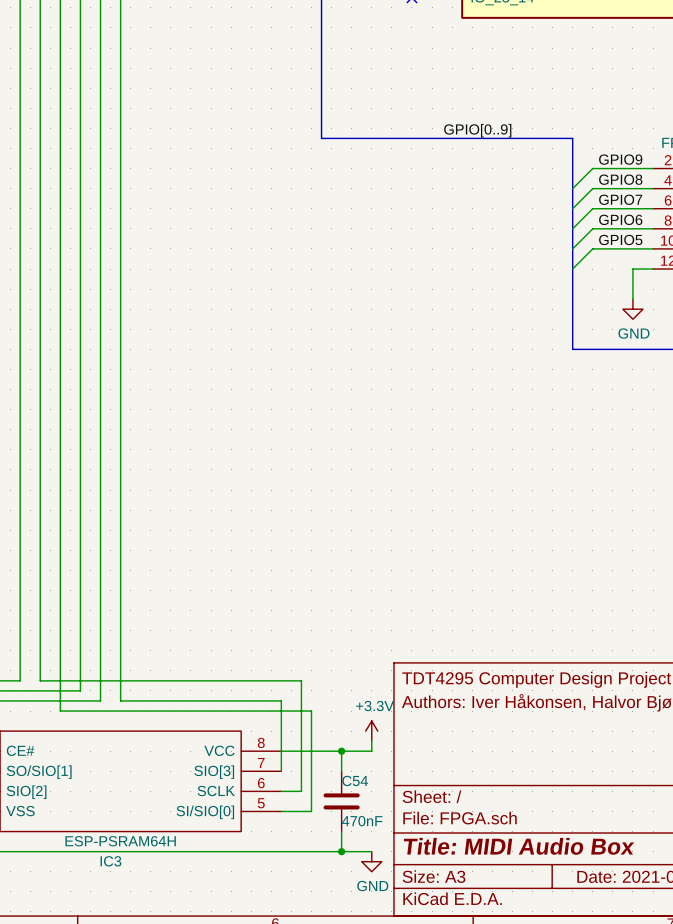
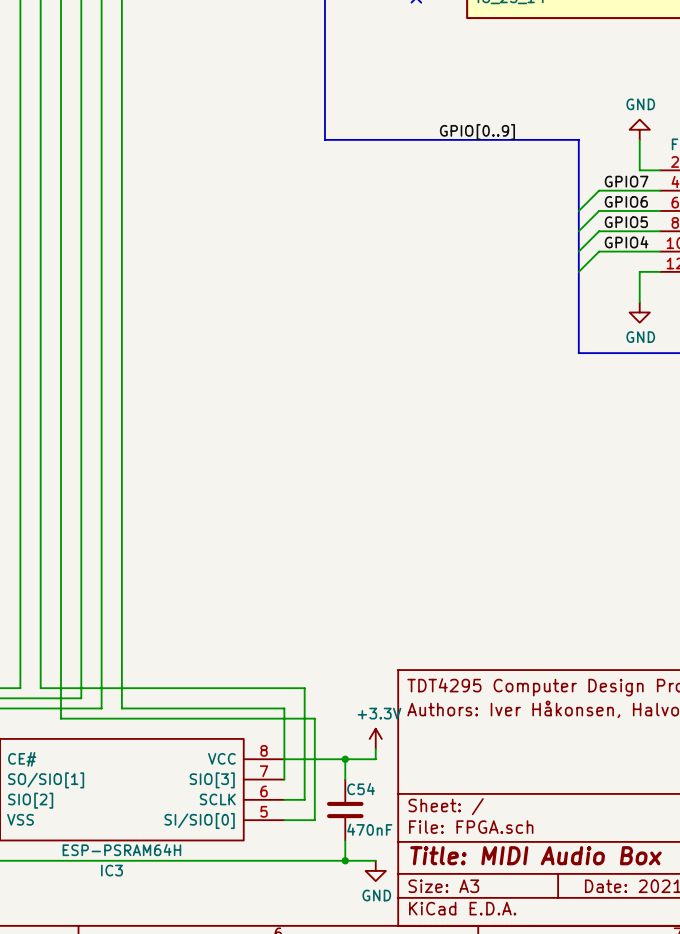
power symbol: none -> GND (639, 129)
label: GPIO9 (620, 159) -> none
wire: (632, 168) (592, 168) (572, 188) -> (639, 170) (639, 139)
label: GPIO8 (620, 179) -> GPIO7 (626, 181)
label: GPIO7 (620, 199) -> GPIO6 (626, 201)
label: GPIO6 (620, 219) -> GPIO5 (626, 222)
label: GPIO5 (620, 239) -> GPIO4 (626, 242)

